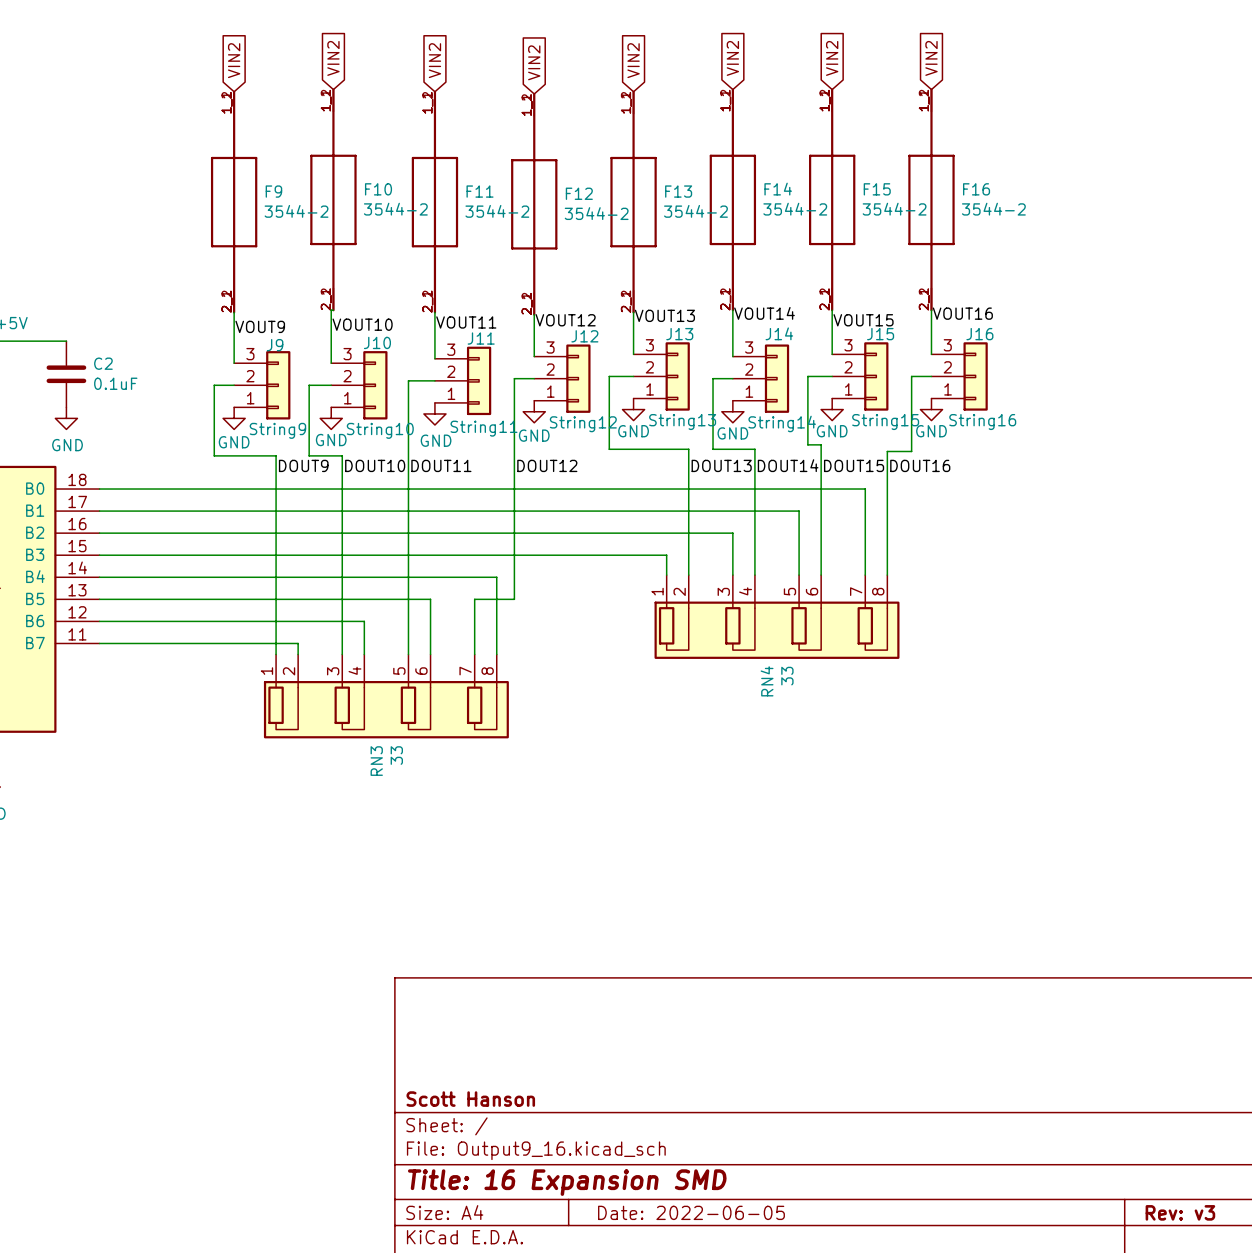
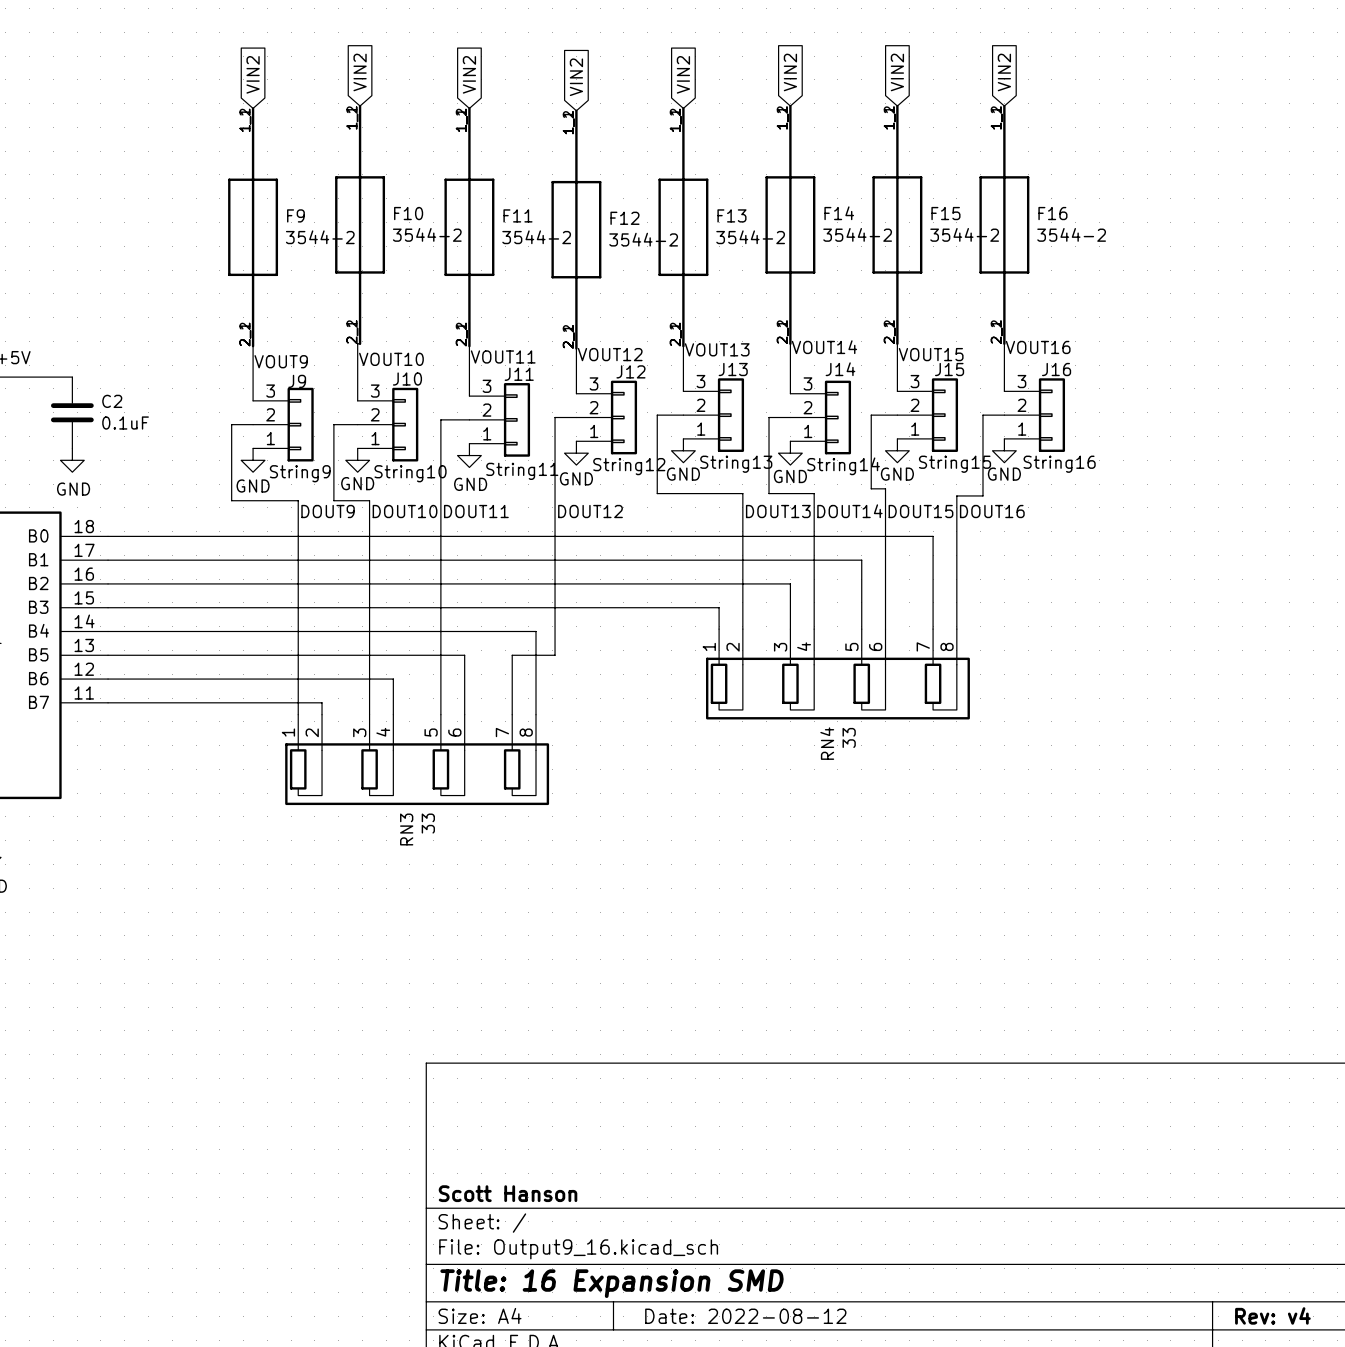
title block: Date: 2022-06-05 (691, 1212) -> Date: 2022-08-12 (745, 1316)
title block: Rev: v3 (1180, 1212) -> Rev: v4 (1272, 1315)

